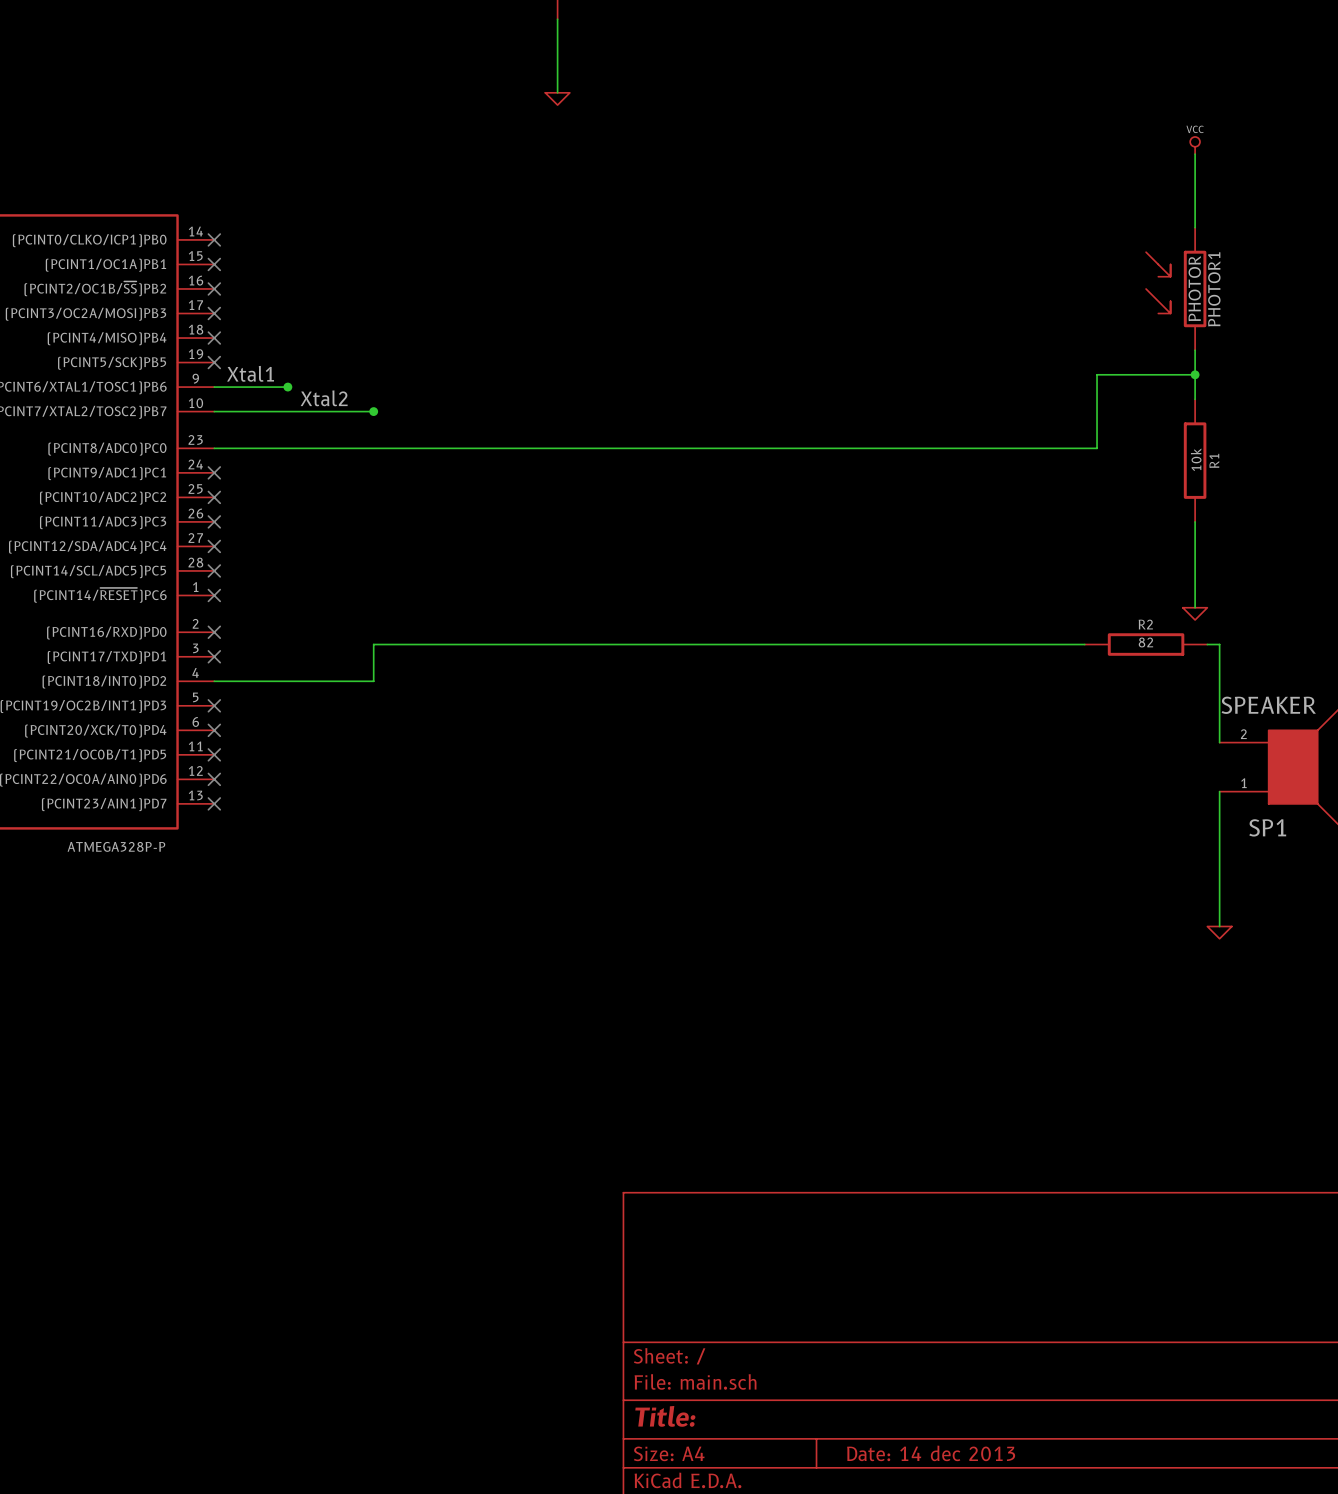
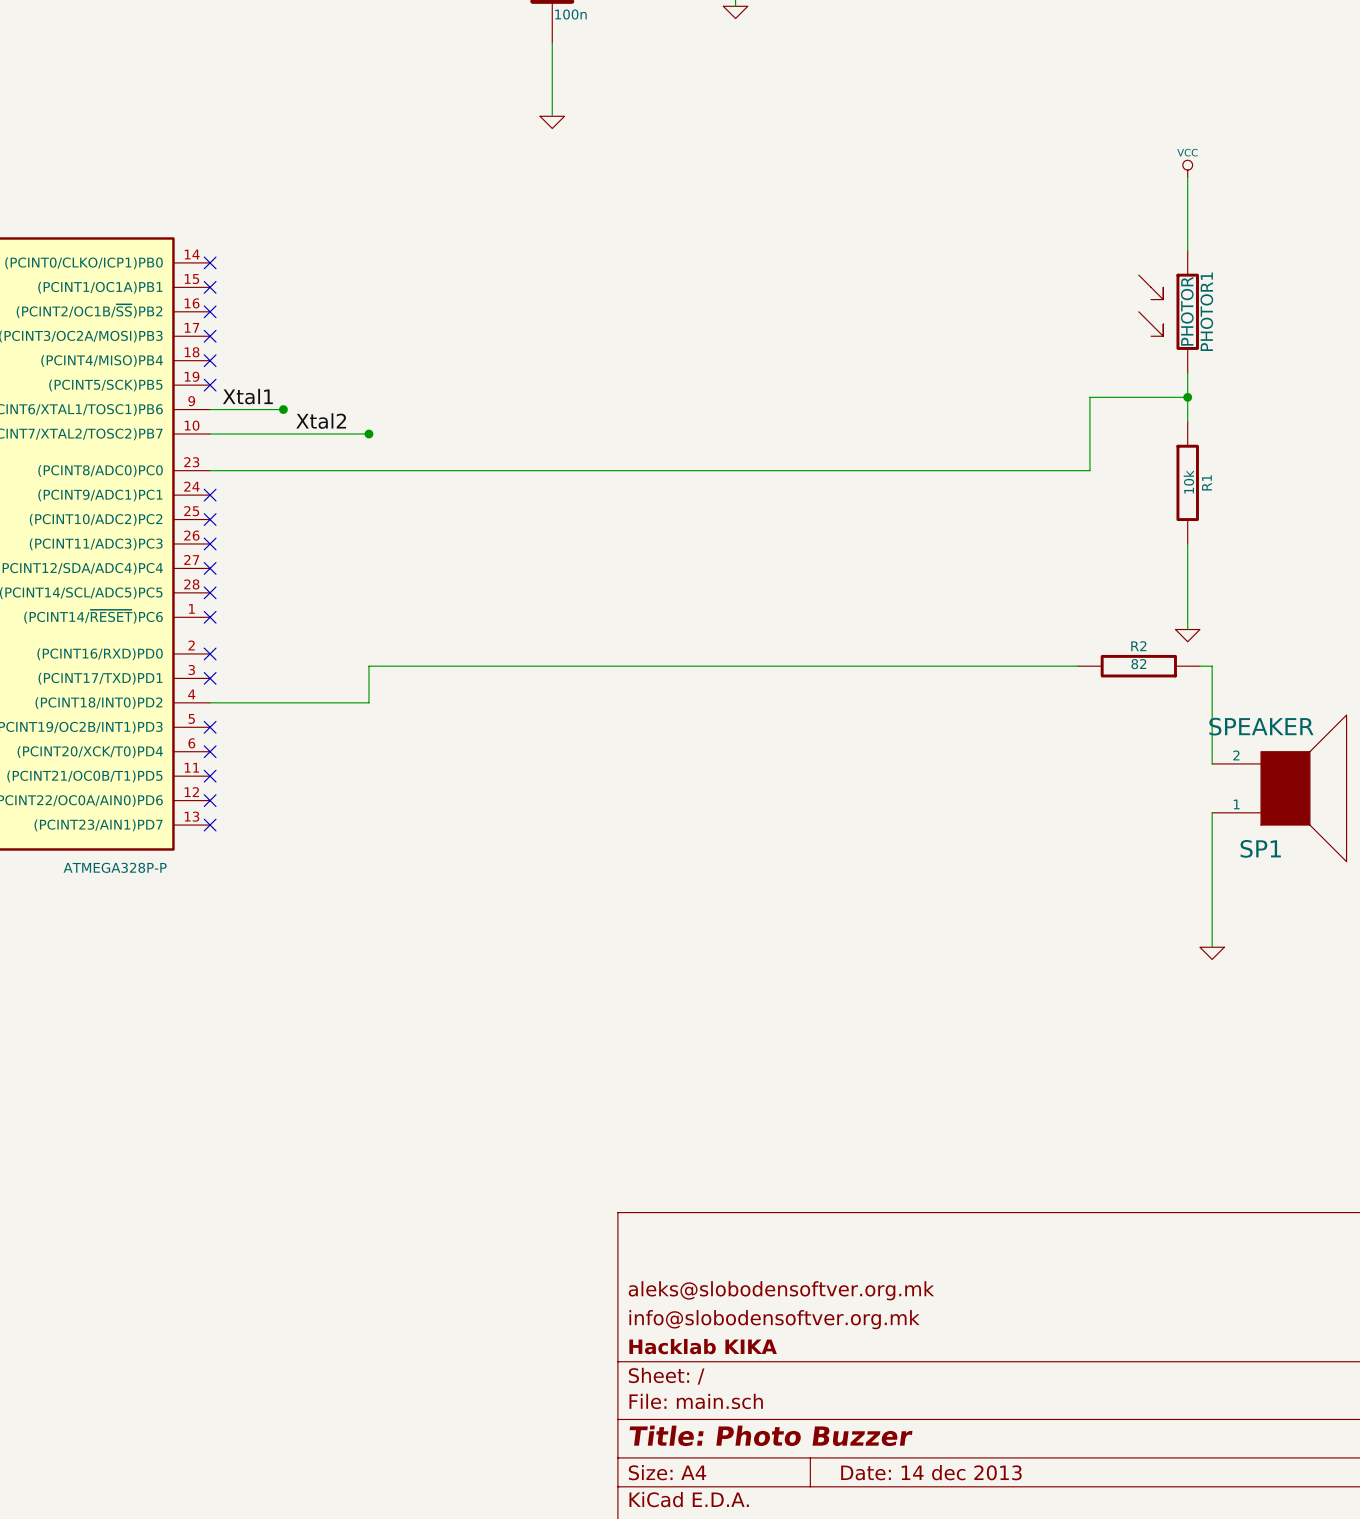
title block: none -> aleks@slobodensoftver.org.mk (781, 1290)
title block: none -> info@slobodensoftver.org.mk (774, 1319)
title block: none -> Hacklab KIKA (703, 1346)
title block: Title: (665, 1416) -> Title: Photo Buzzer (771, 1435)

